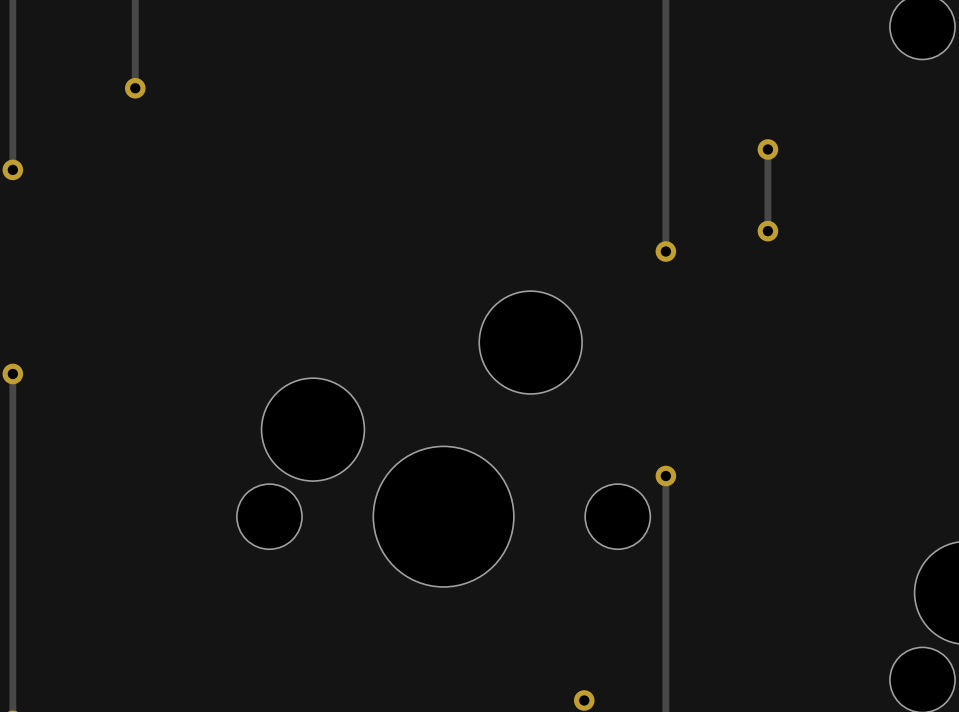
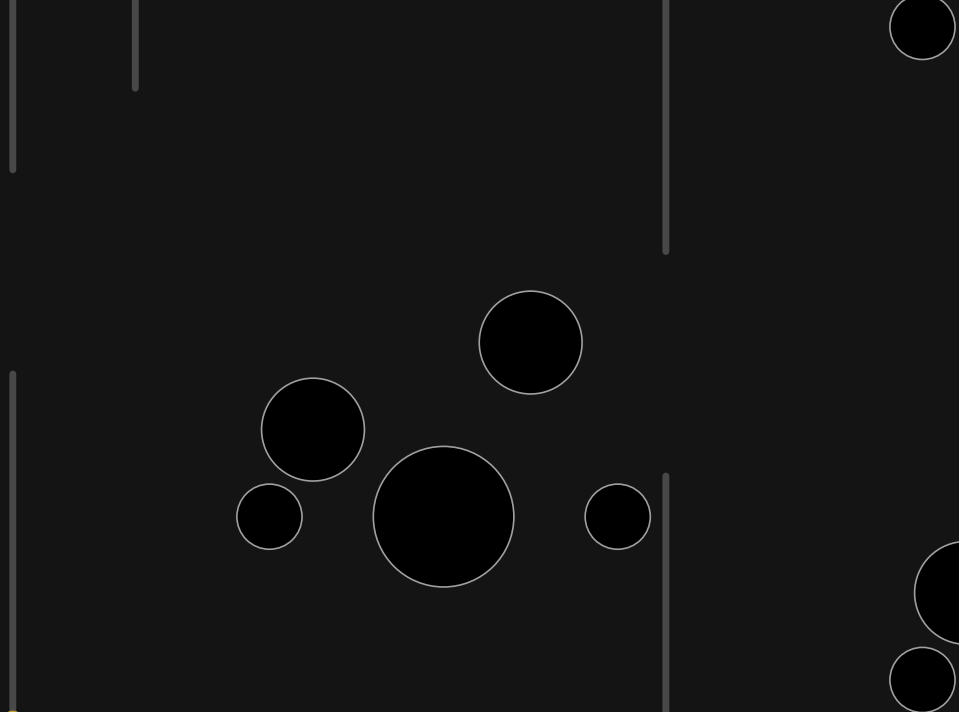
via: (135, 88) -> none
track: (767, 149) (767, 231) -> none
via: (767, 149) -> none
via: (12, 169) -> none
via: (767, 231) -> none
via: (665, 251) -> none
via: (12, 373) -> none
via: (665, 476) -> none
via: (584, 700) -> none

